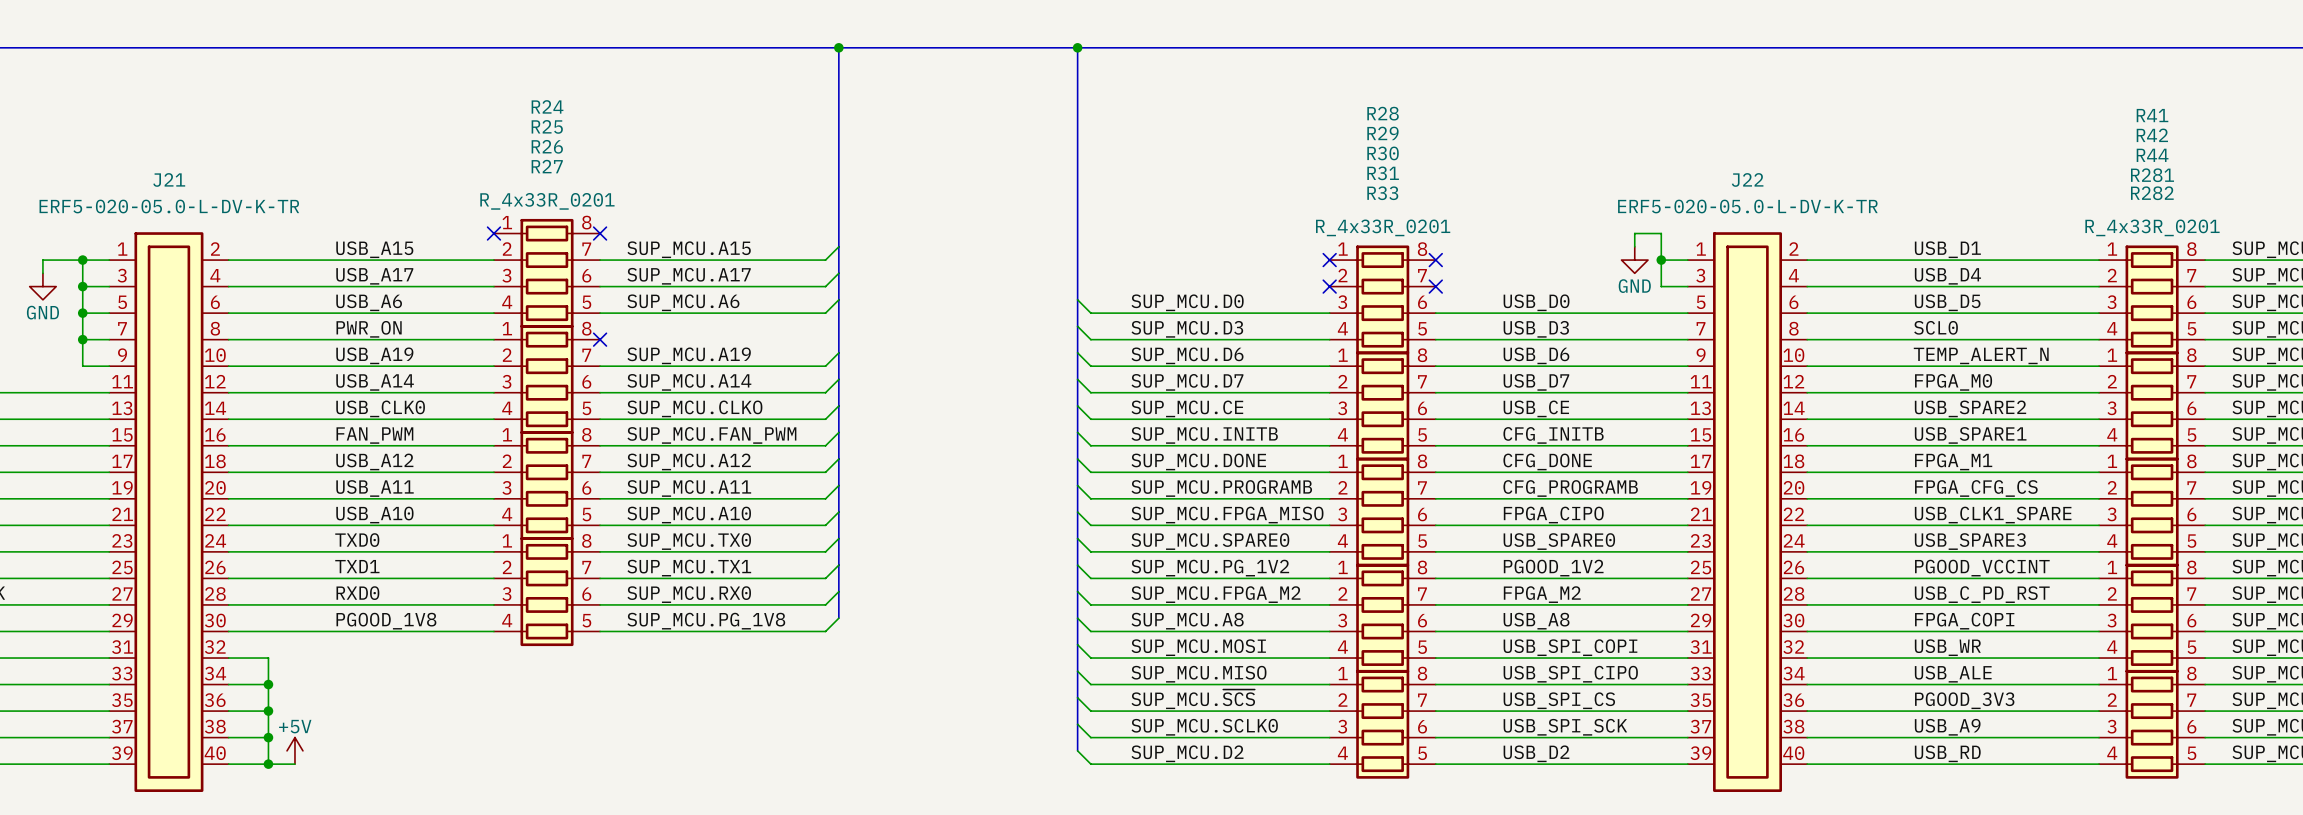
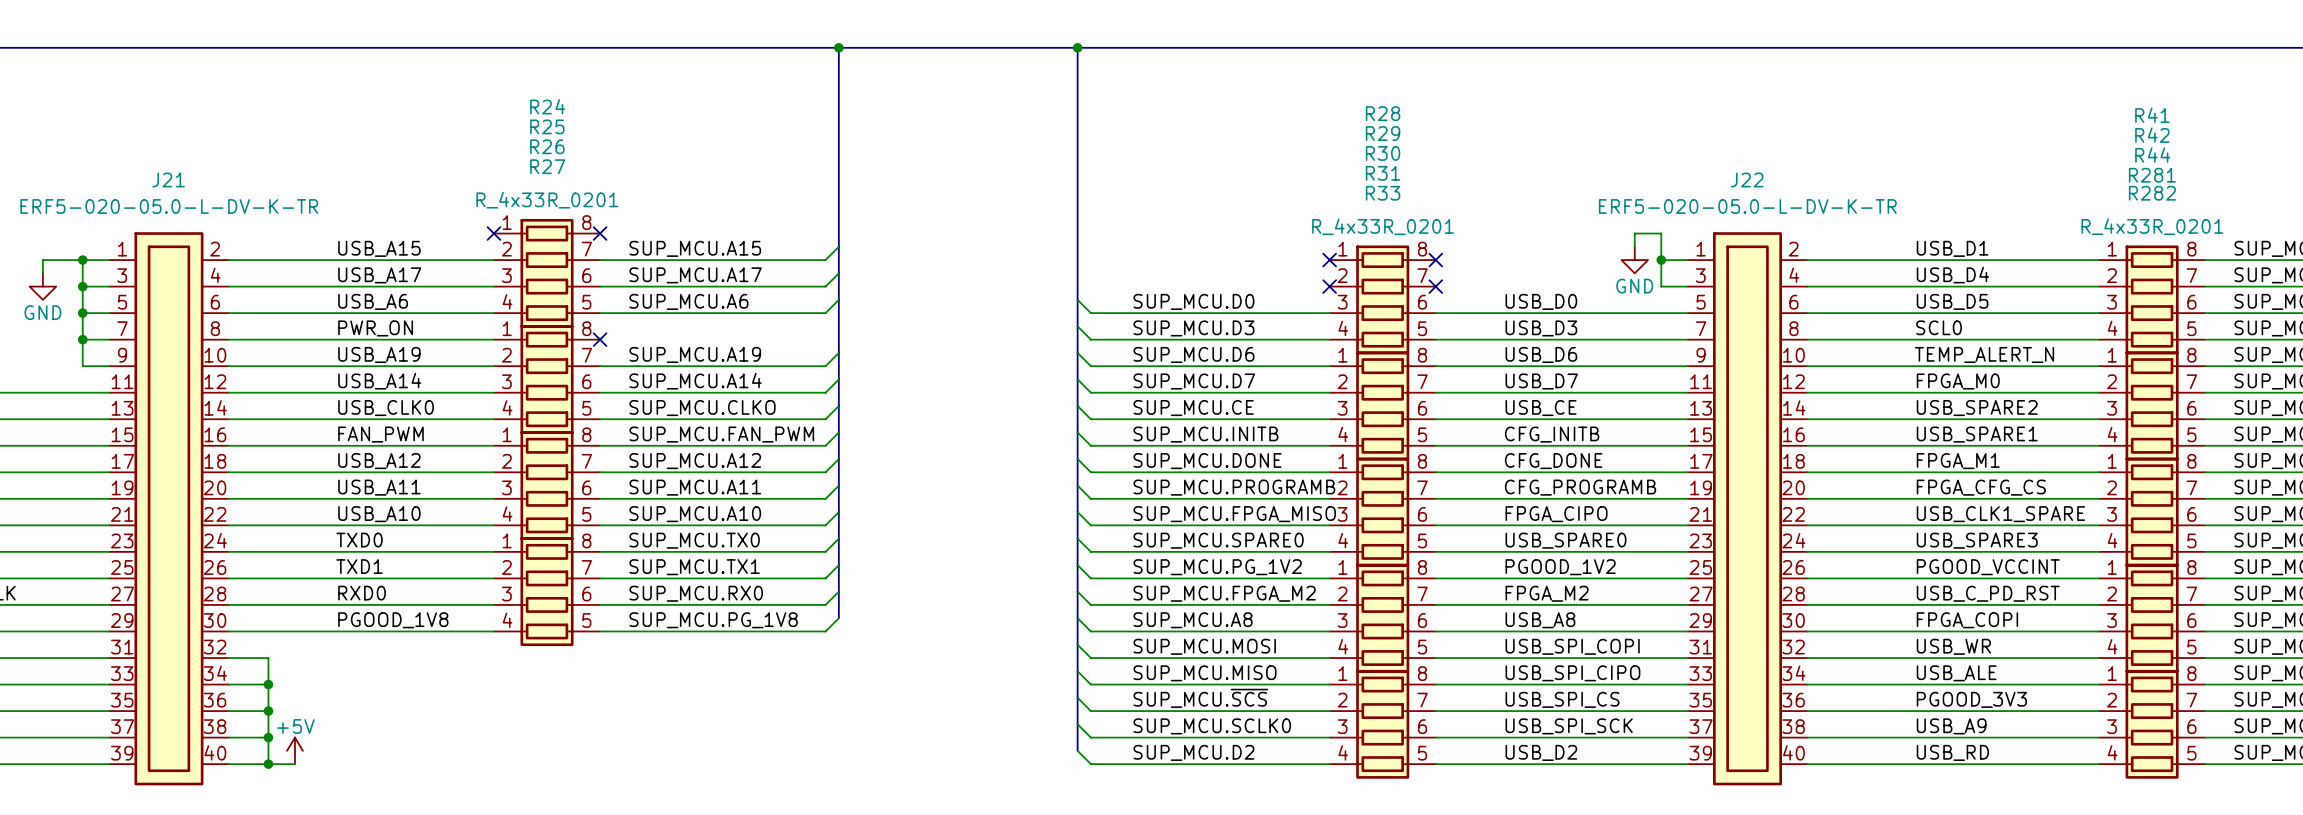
J21 symbol: [109, 232, 229, 792] -> [109, 232, 229, 786]
J22 symbol: [1687, 232, 1808, 792] -> [1687, 232, 1808, 786]

